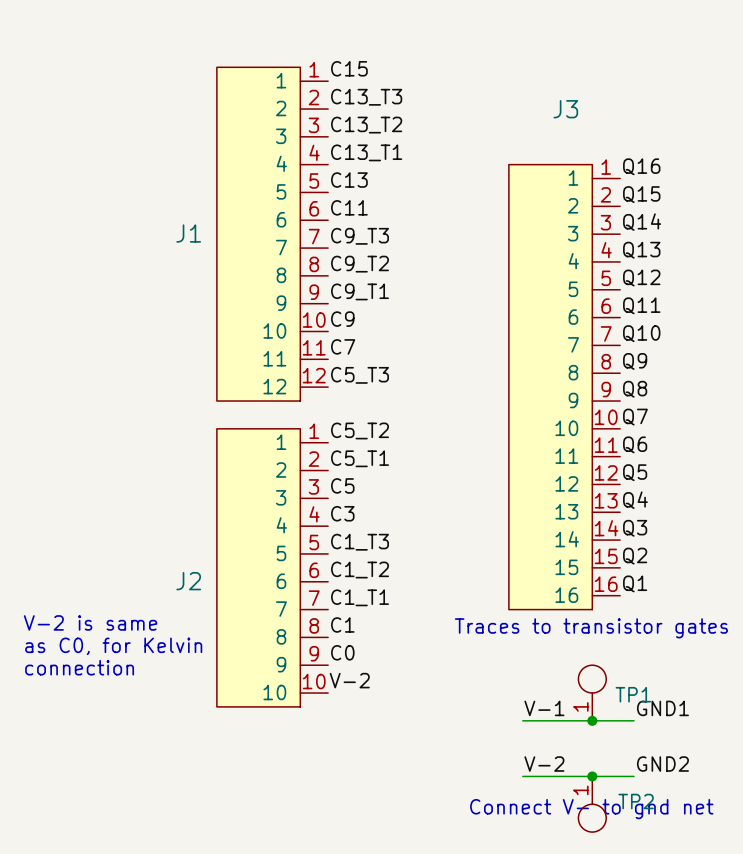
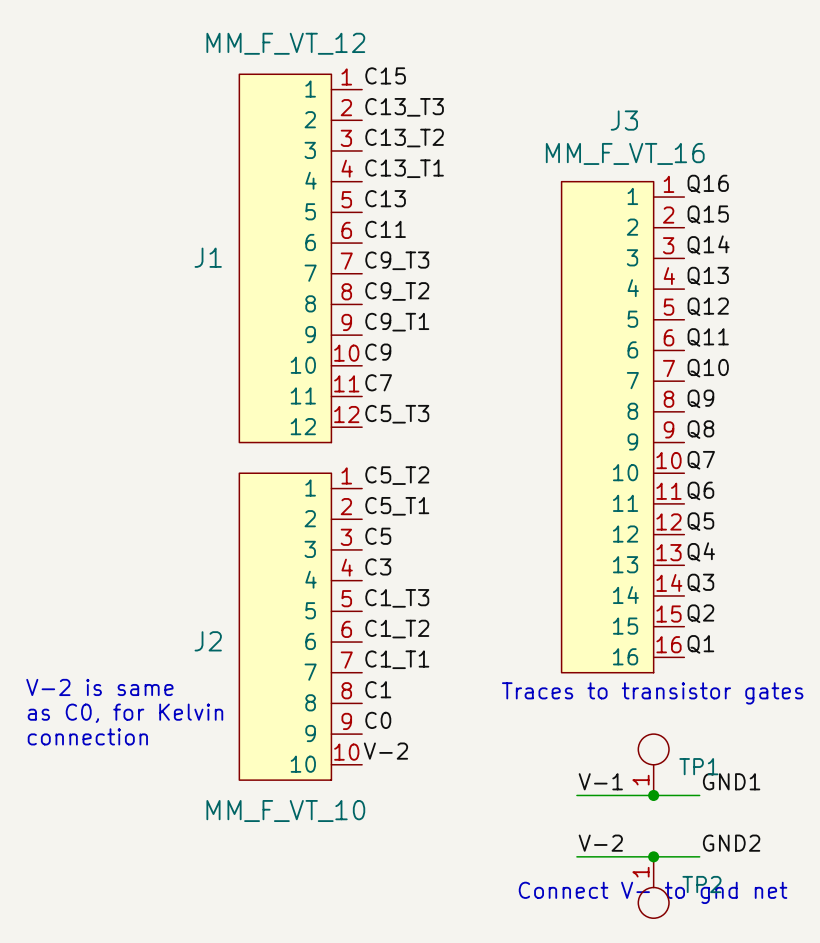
J1 value: none -> MM_F_VT_12 (285, 43)
J3 value: none -> MM_F_VT_16 (625, 153)
J2 value: none -> MM_F_VT_10 (285, 811)

